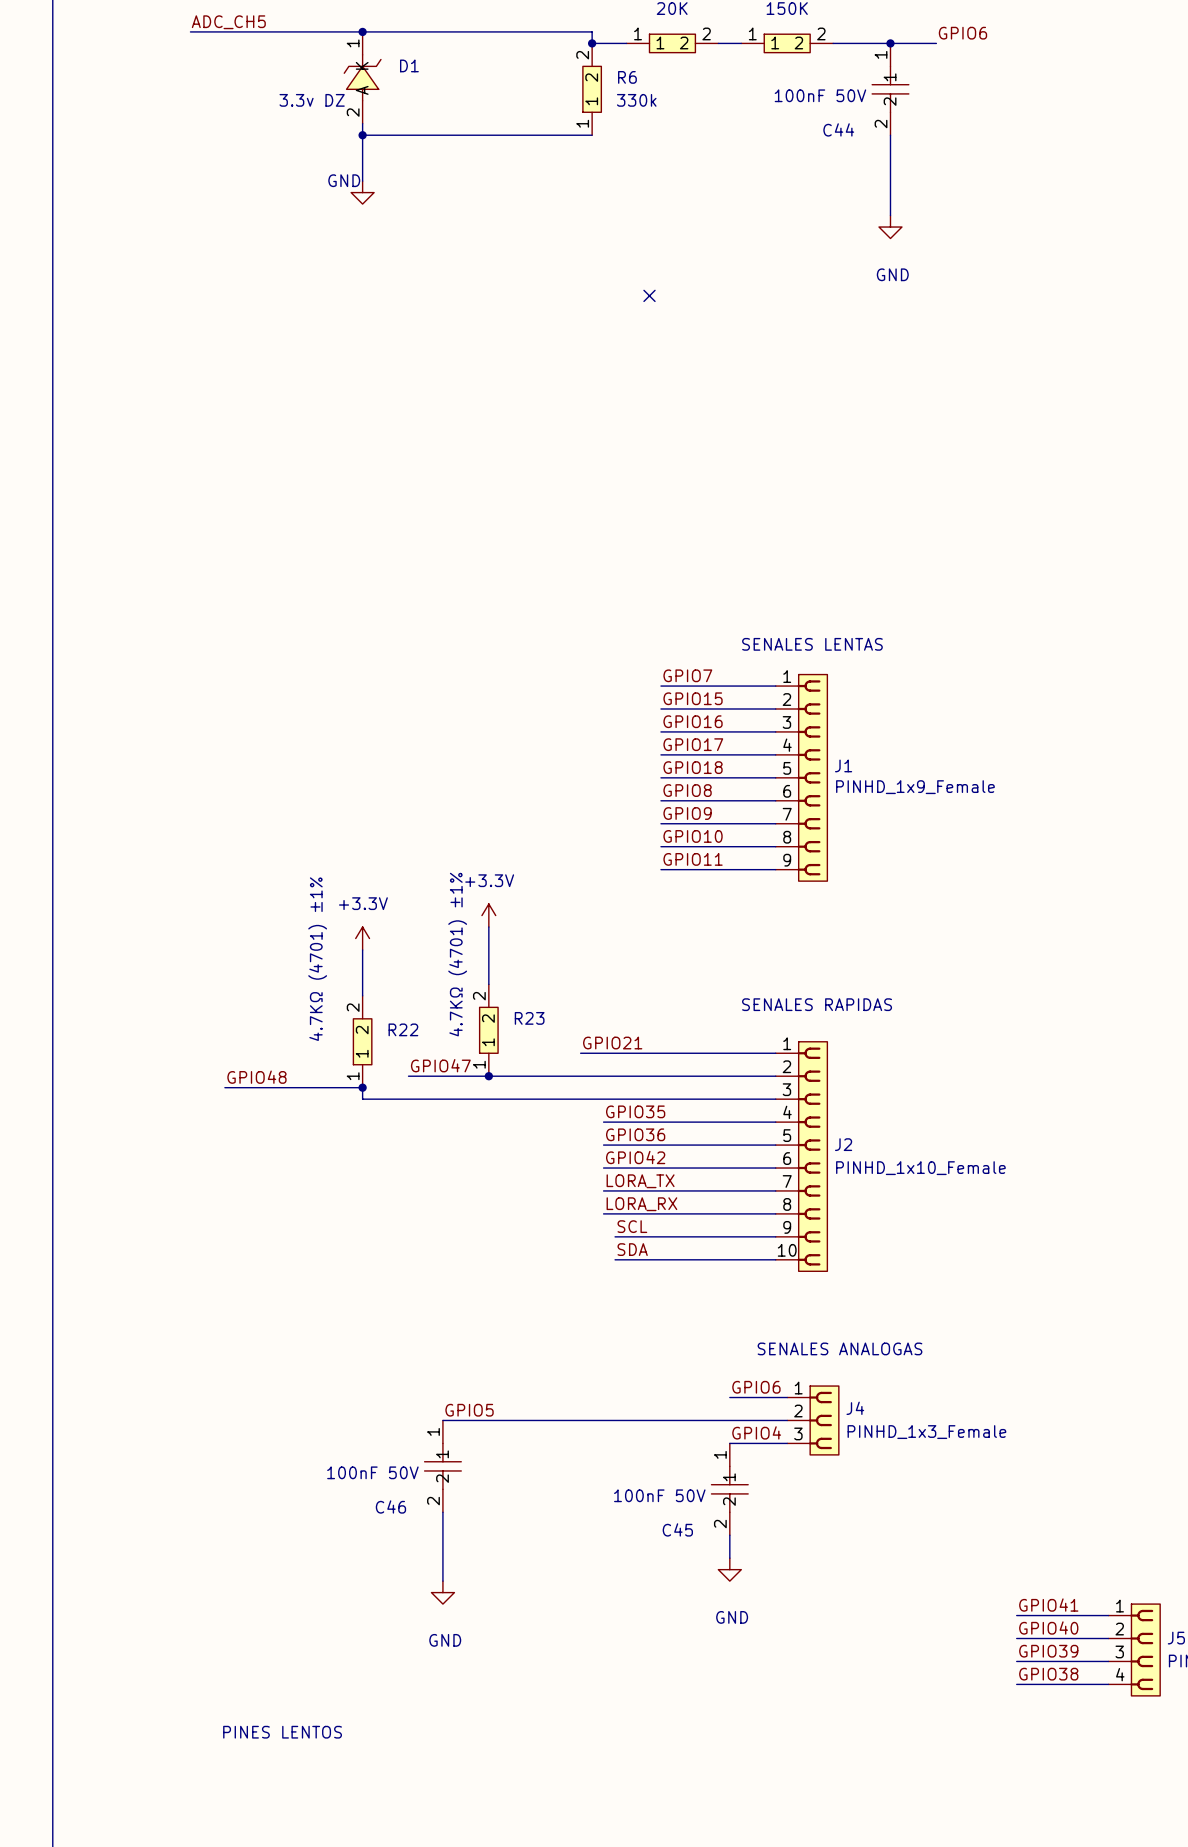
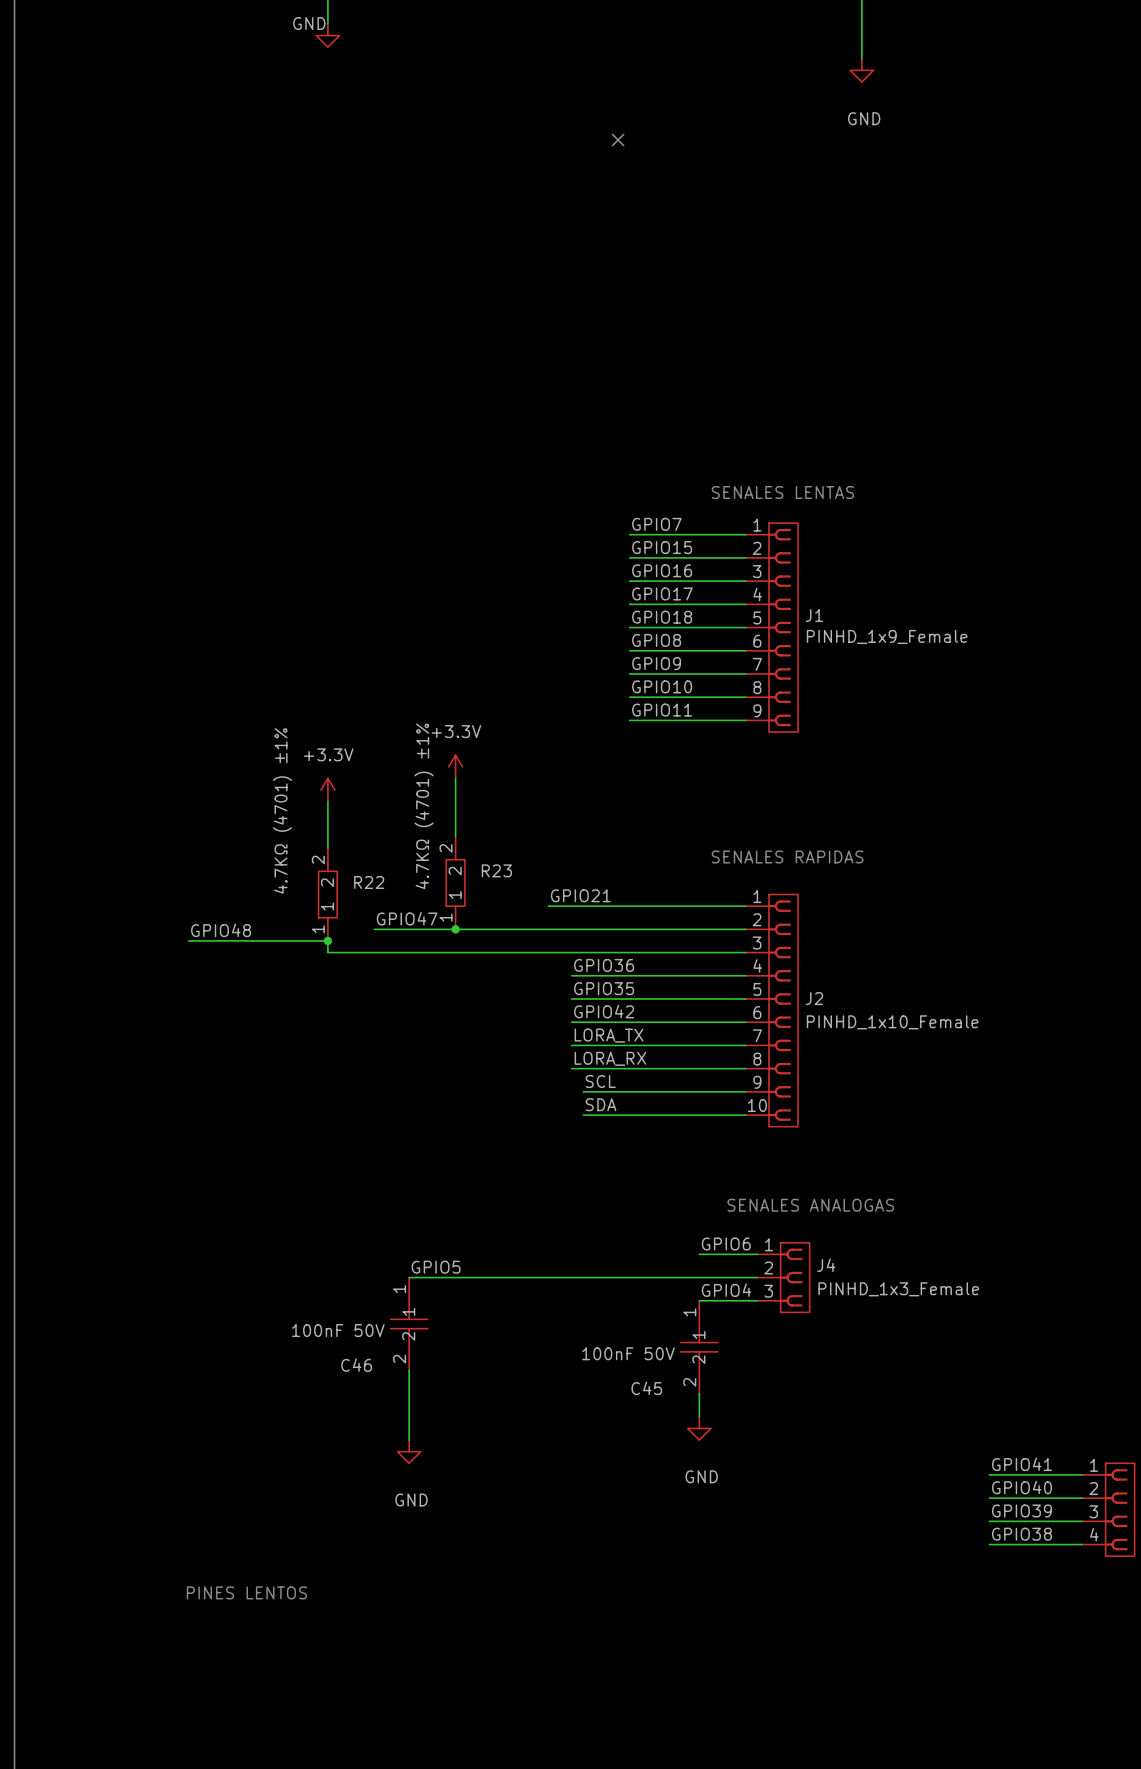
label: GPIO35 (635, 1111) -> GPIO36 (604, 965)
label: GPIO36 (635, 1134) -> GPIO35 (604, 988)

